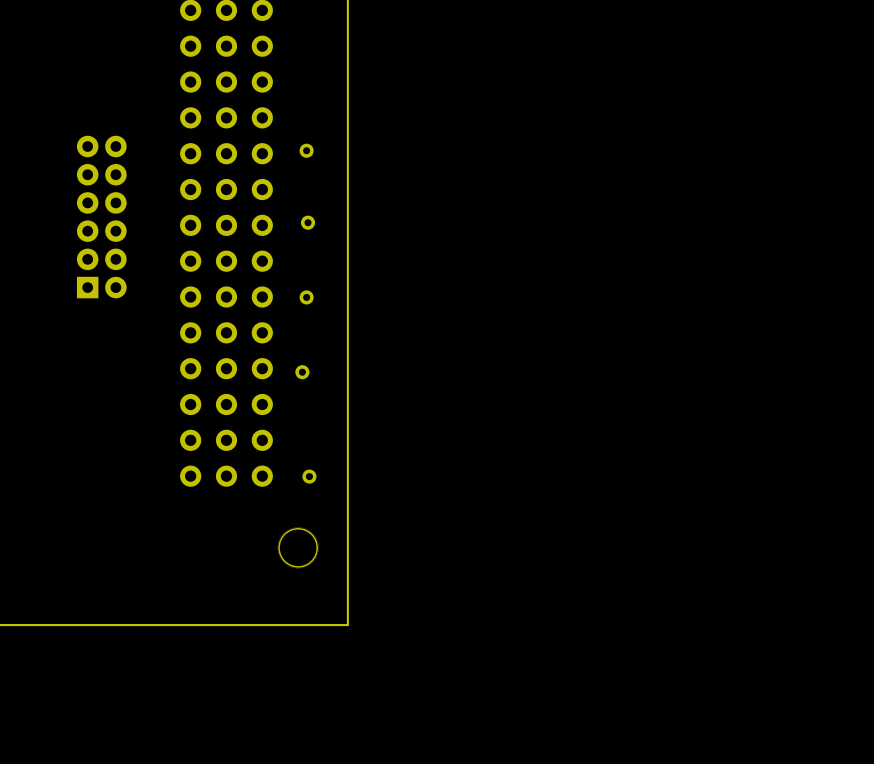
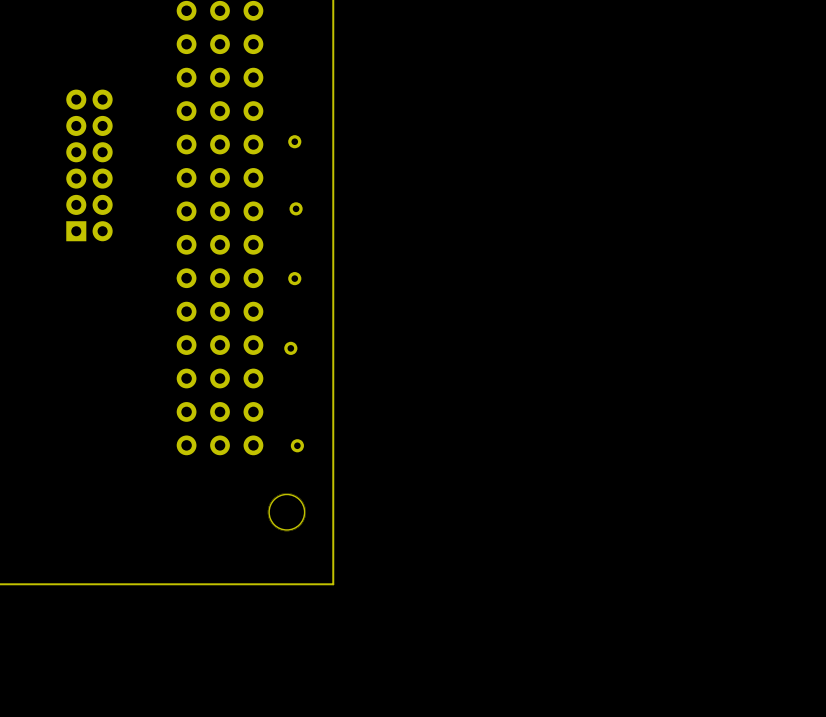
part position: (101, 217) -> (89, 165)

